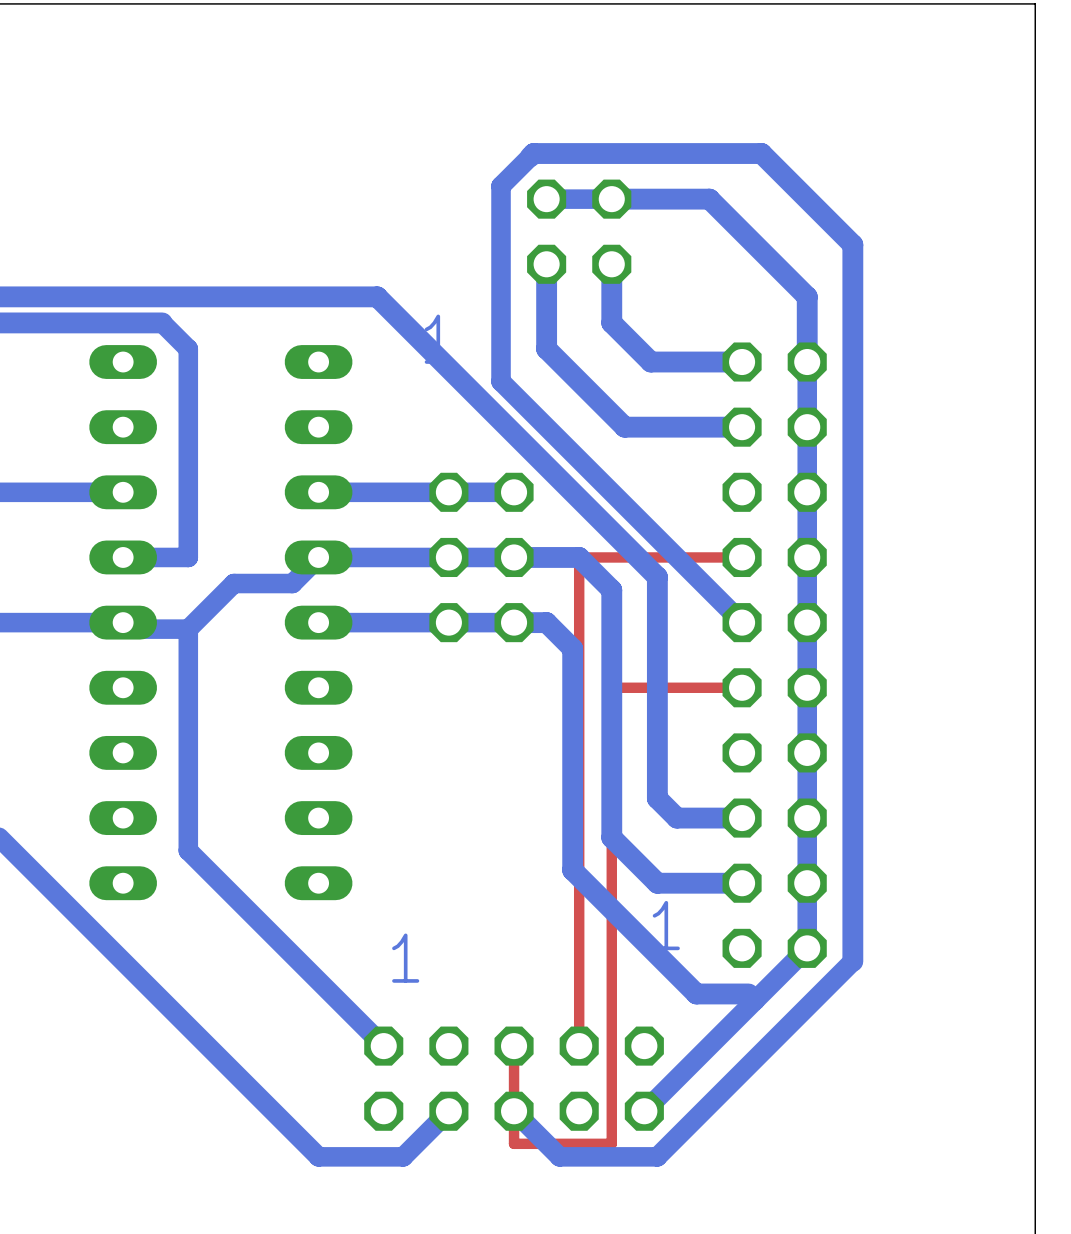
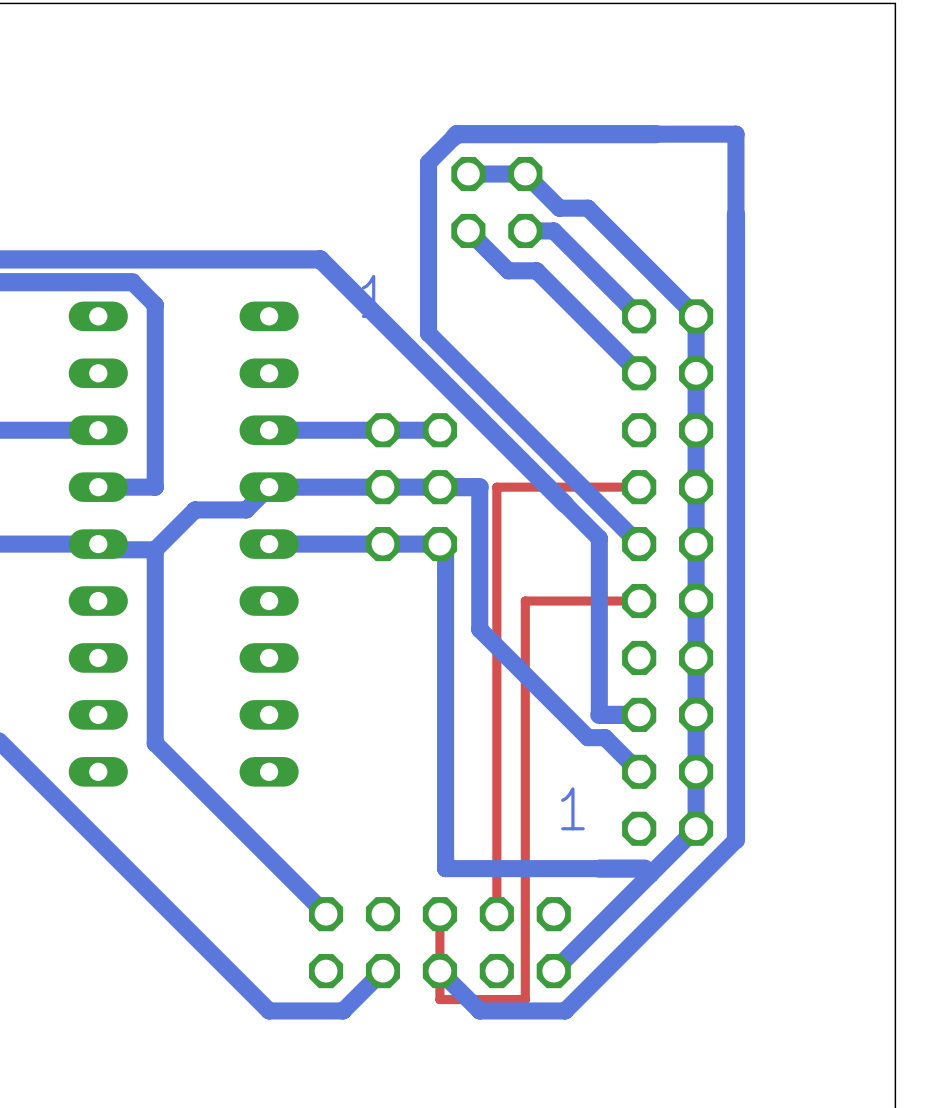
bottom track: (761, 153) (852, 244) -> (656, 134) (735, 134) (735, 213)
bottom track: (611, 199) (709, 199) (807, 296) (807, 362) -> (525, 174) (559, 208) (587, 208) (696, 316)
bottom track: (546, 264) (546, 348) (624, 427) (742, 427) -> (468, 230) (508, 270) (536, 270) (639, 373)
bottom track: (611, 264) (611, 322) (650, 362) (742, 362) -> (525, 230) (553, 230) (639, 316)
bottom track: (559, 557) (579, 557) (611, 590) (611, 837) (657, 883) (742, 883) -> (479, 487) (479, 629) (587, 737) (605, 737) (639, 771)
bottom track: (657, 577) (657, 798) (676, 818) (696, 818) -> (565, 504) (599, 538) (599, 714)
bottom track: (514, 622) (546, 622) (572, 648) (572, 870) (696, 993) -> (439, 544) (445, 549) (445, 868) (599, 868)
text: 1 (405, 958) -> none

